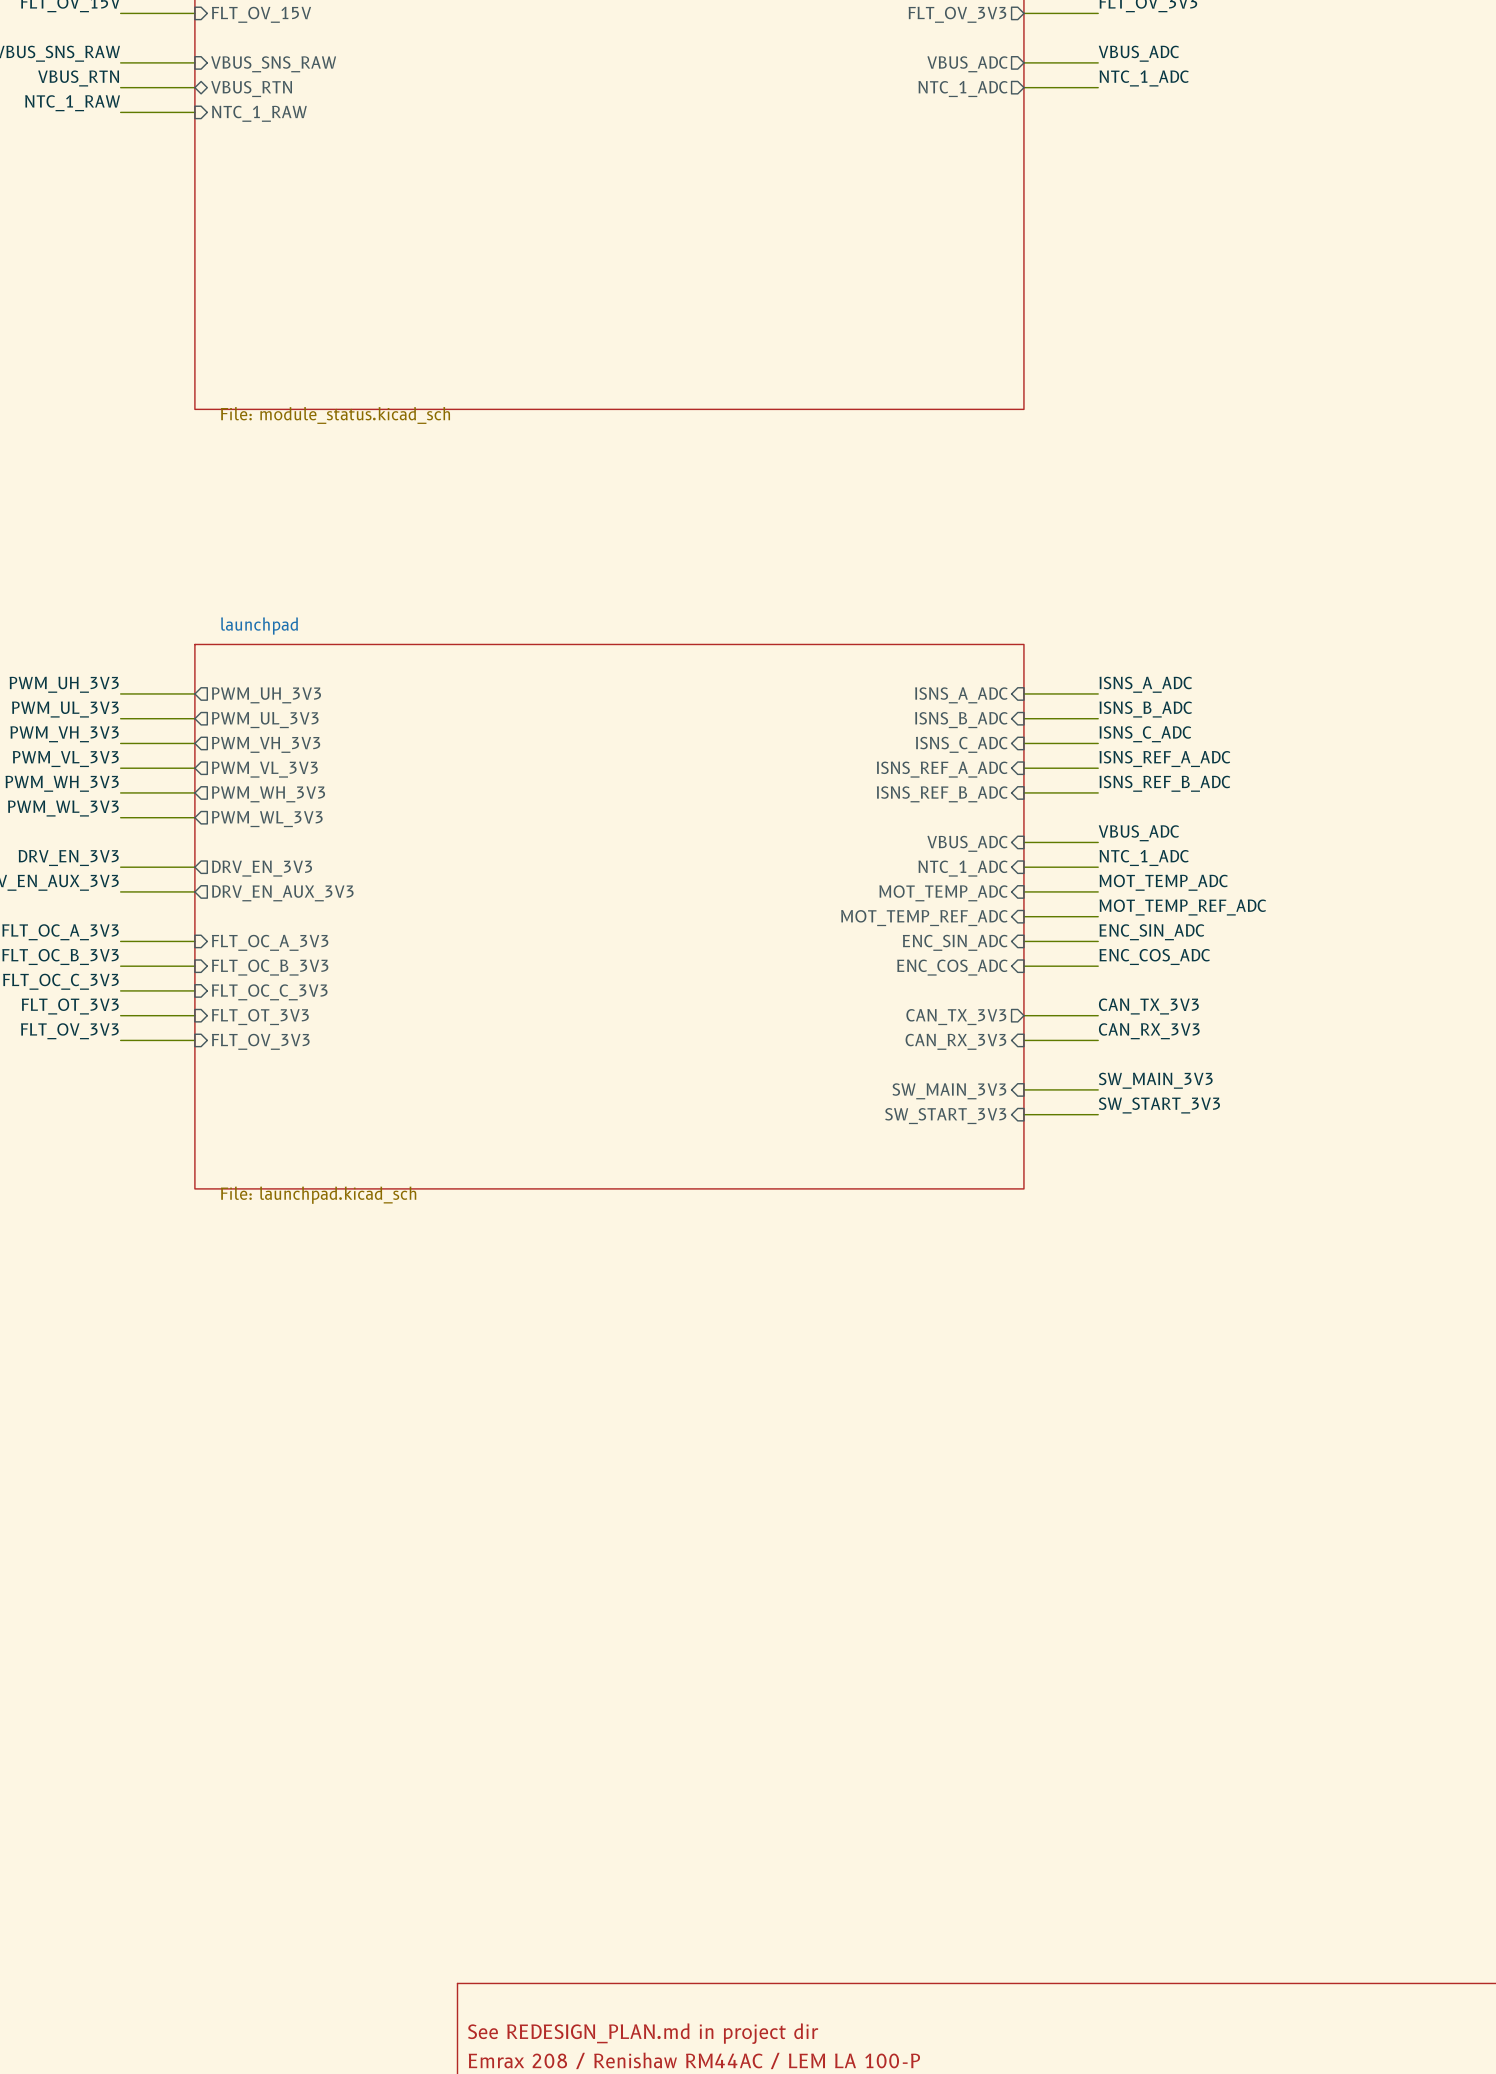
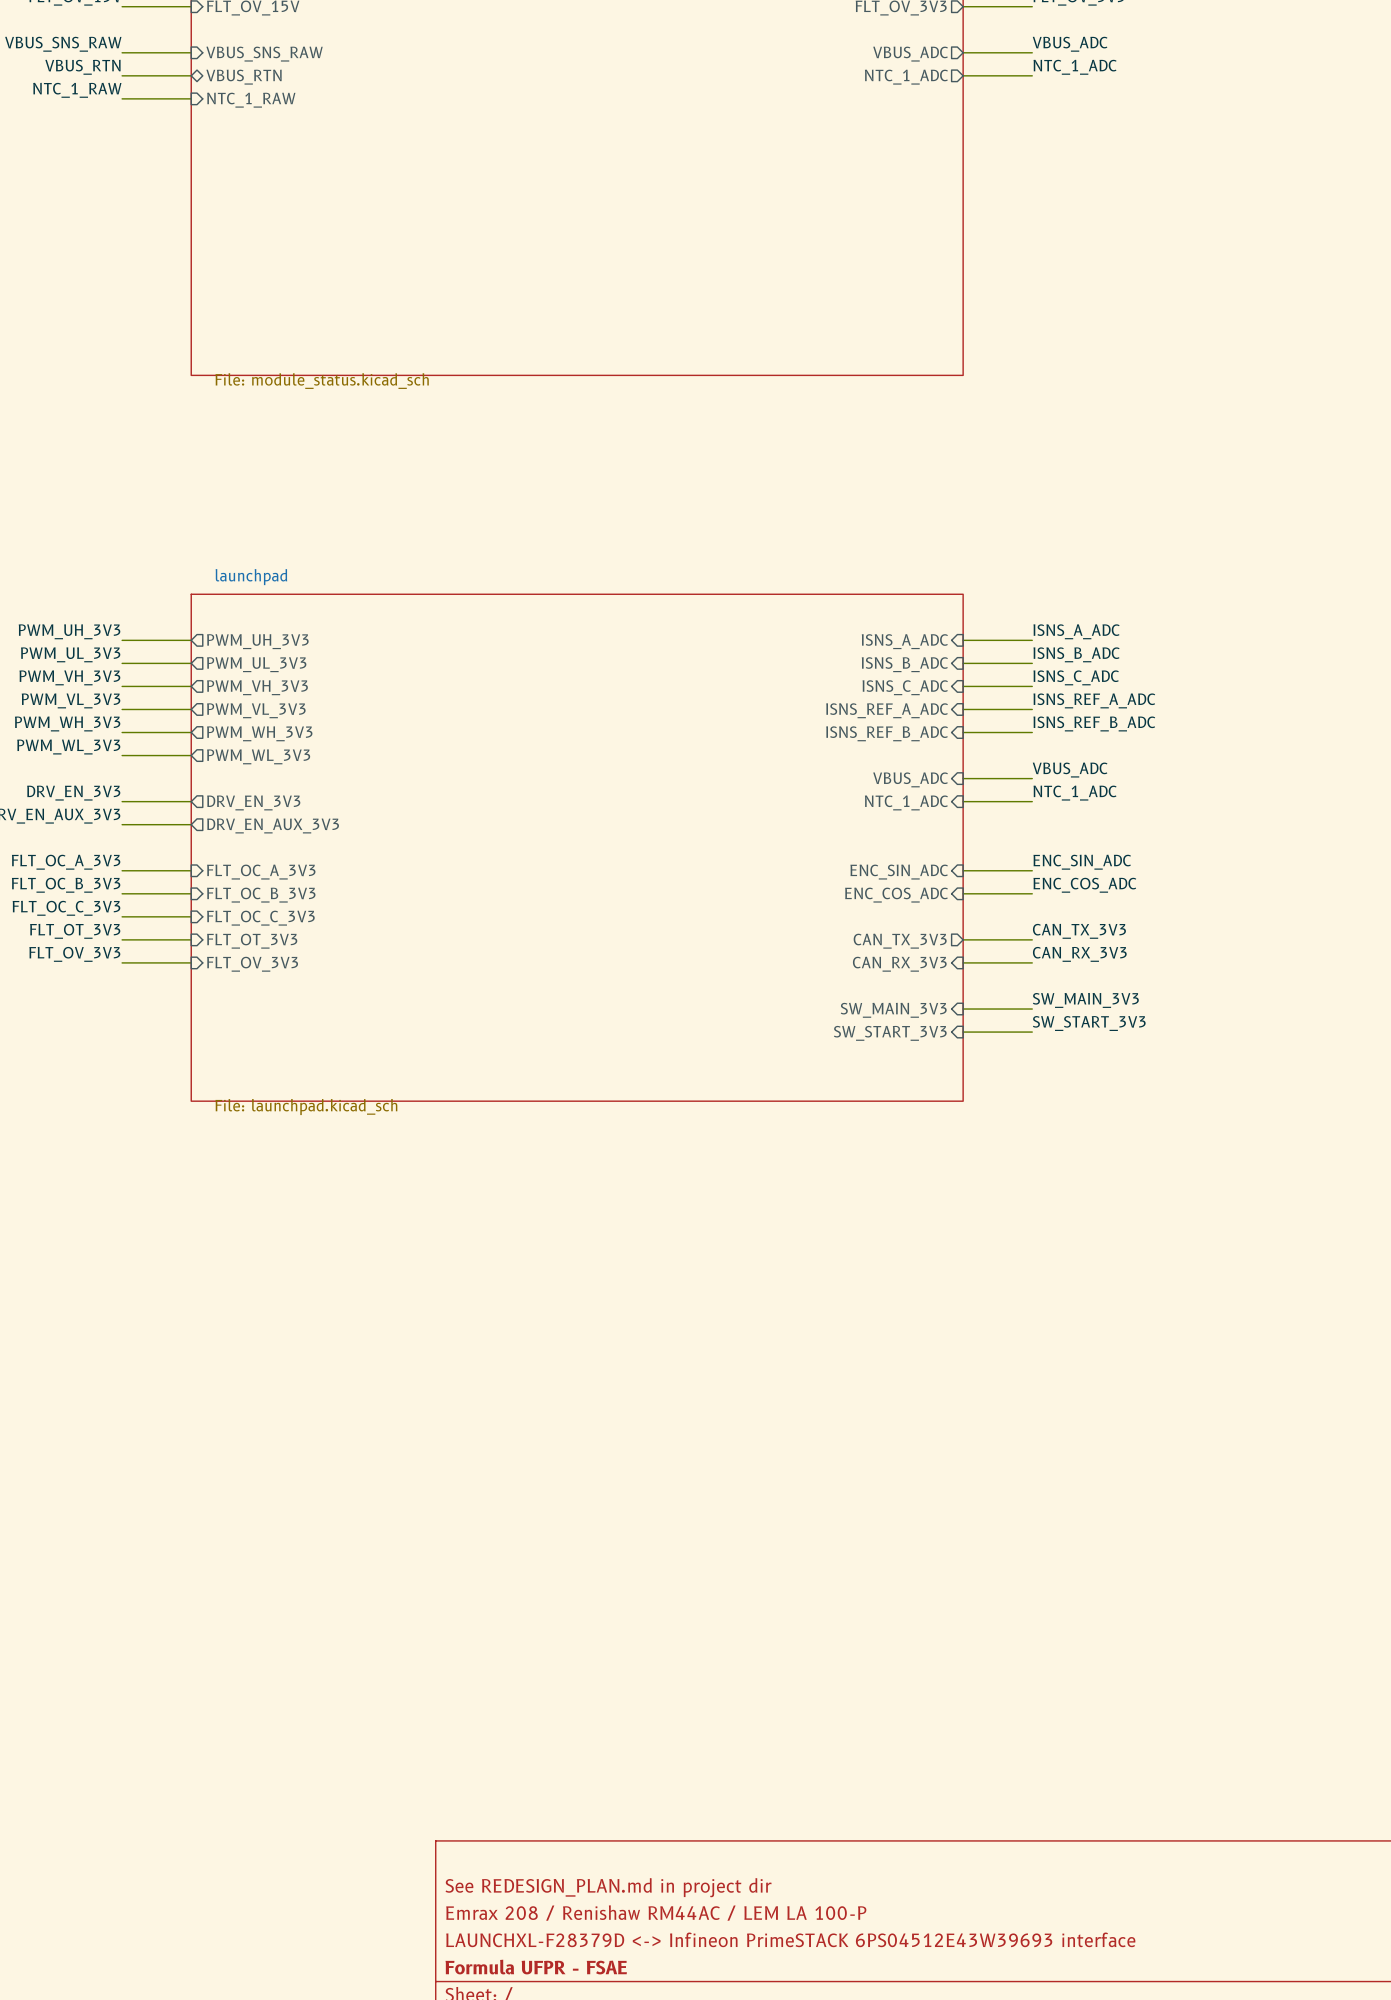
label: MOT_TEMP_ADC (1163, 882) -> none
wire: (1023, 891) (1098, 891) -> none
sheet pin: MOT_TEMP_ADC (943, 893) -> none
label: MOT_TEMP_REF_ADC (1182, 907) -> none
wire: (1023, 916) (1098, 916) -> none
sheet pin: MOT_TEMP_REF_ADC (924, 918) -> none

